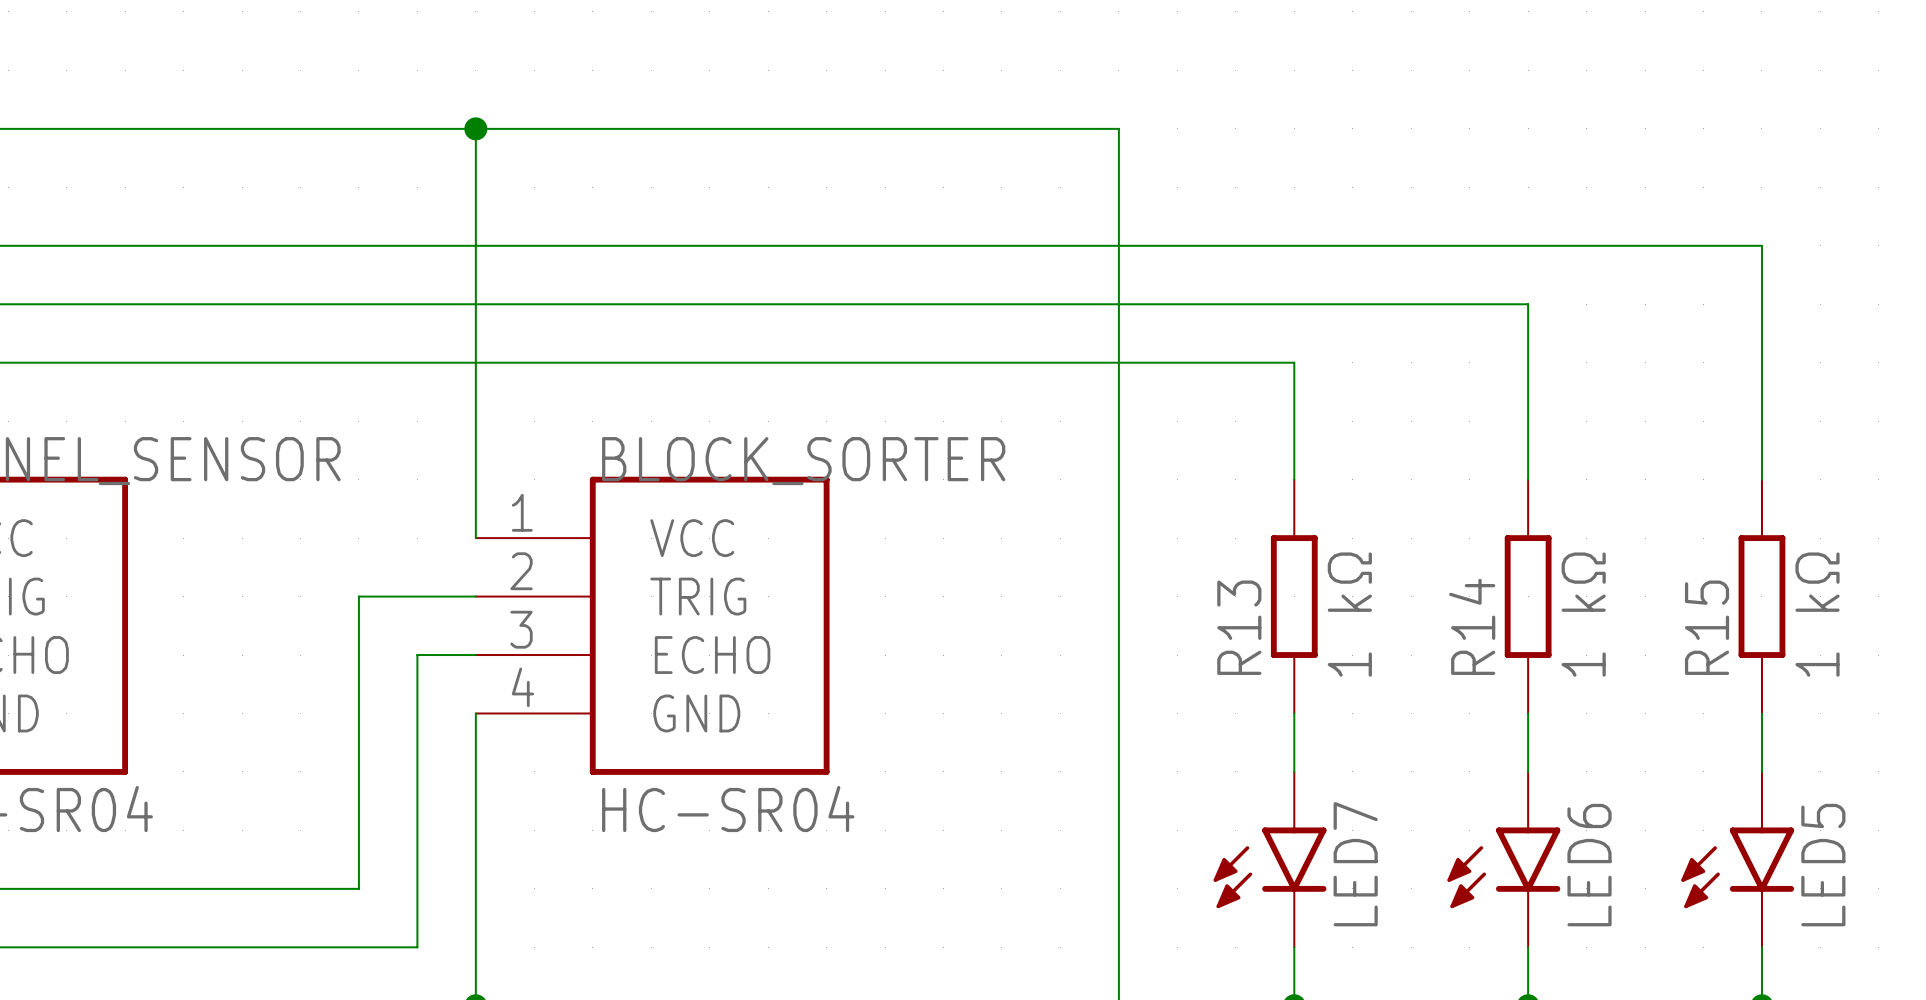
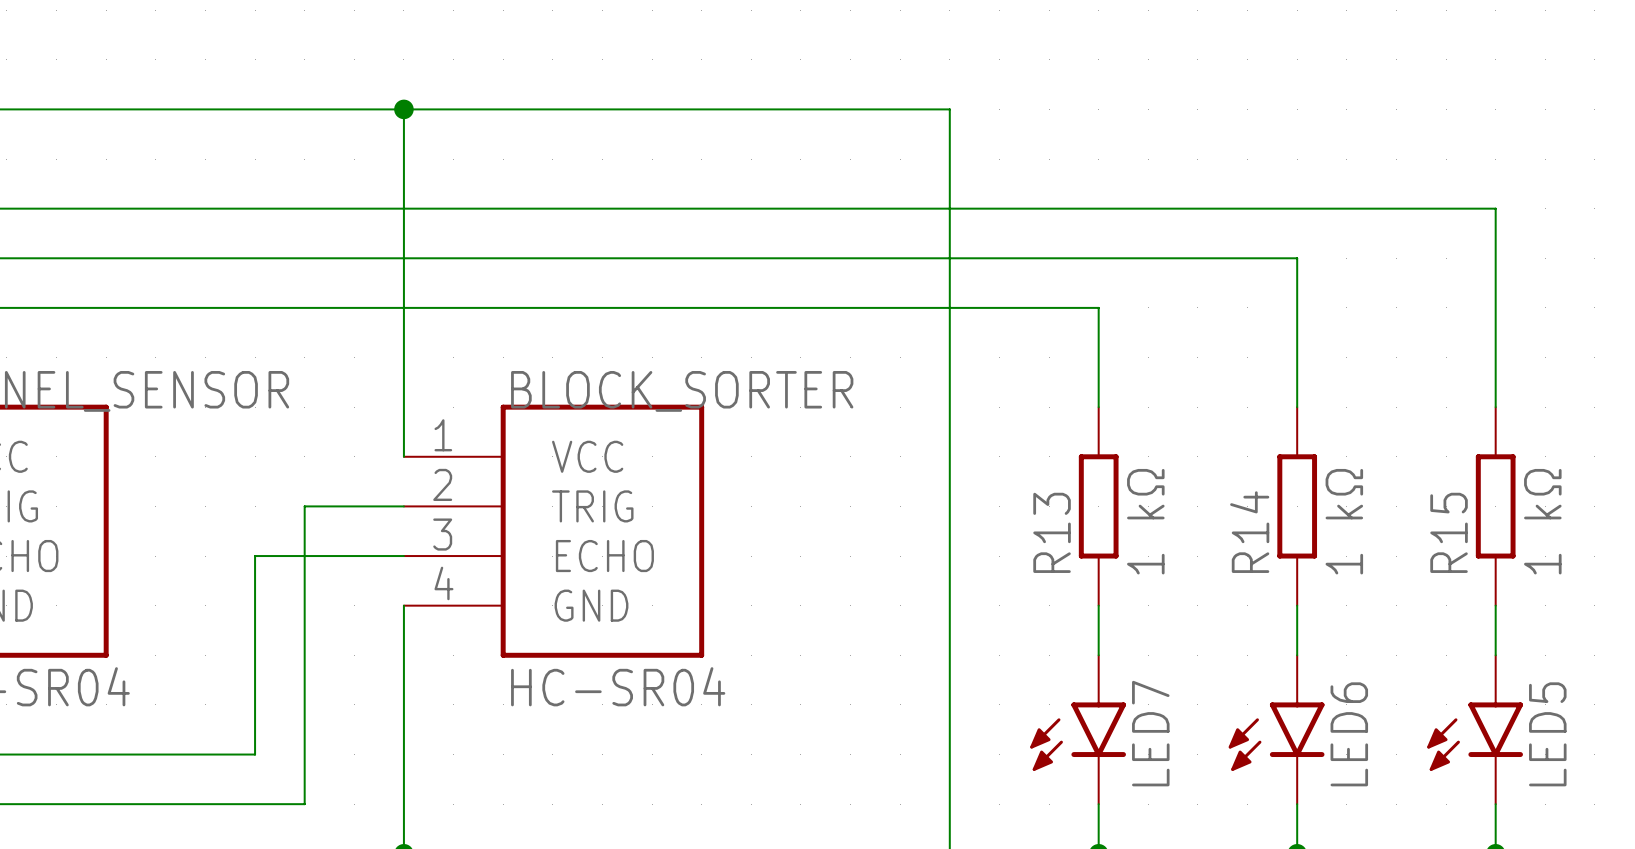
wire: (417, 655) (417, 947) (358, 947) -> (354, 556) (255, 556) (255, 754)
wire: (300, 888) (358, 888) -> (304, 804) (304, 754)

